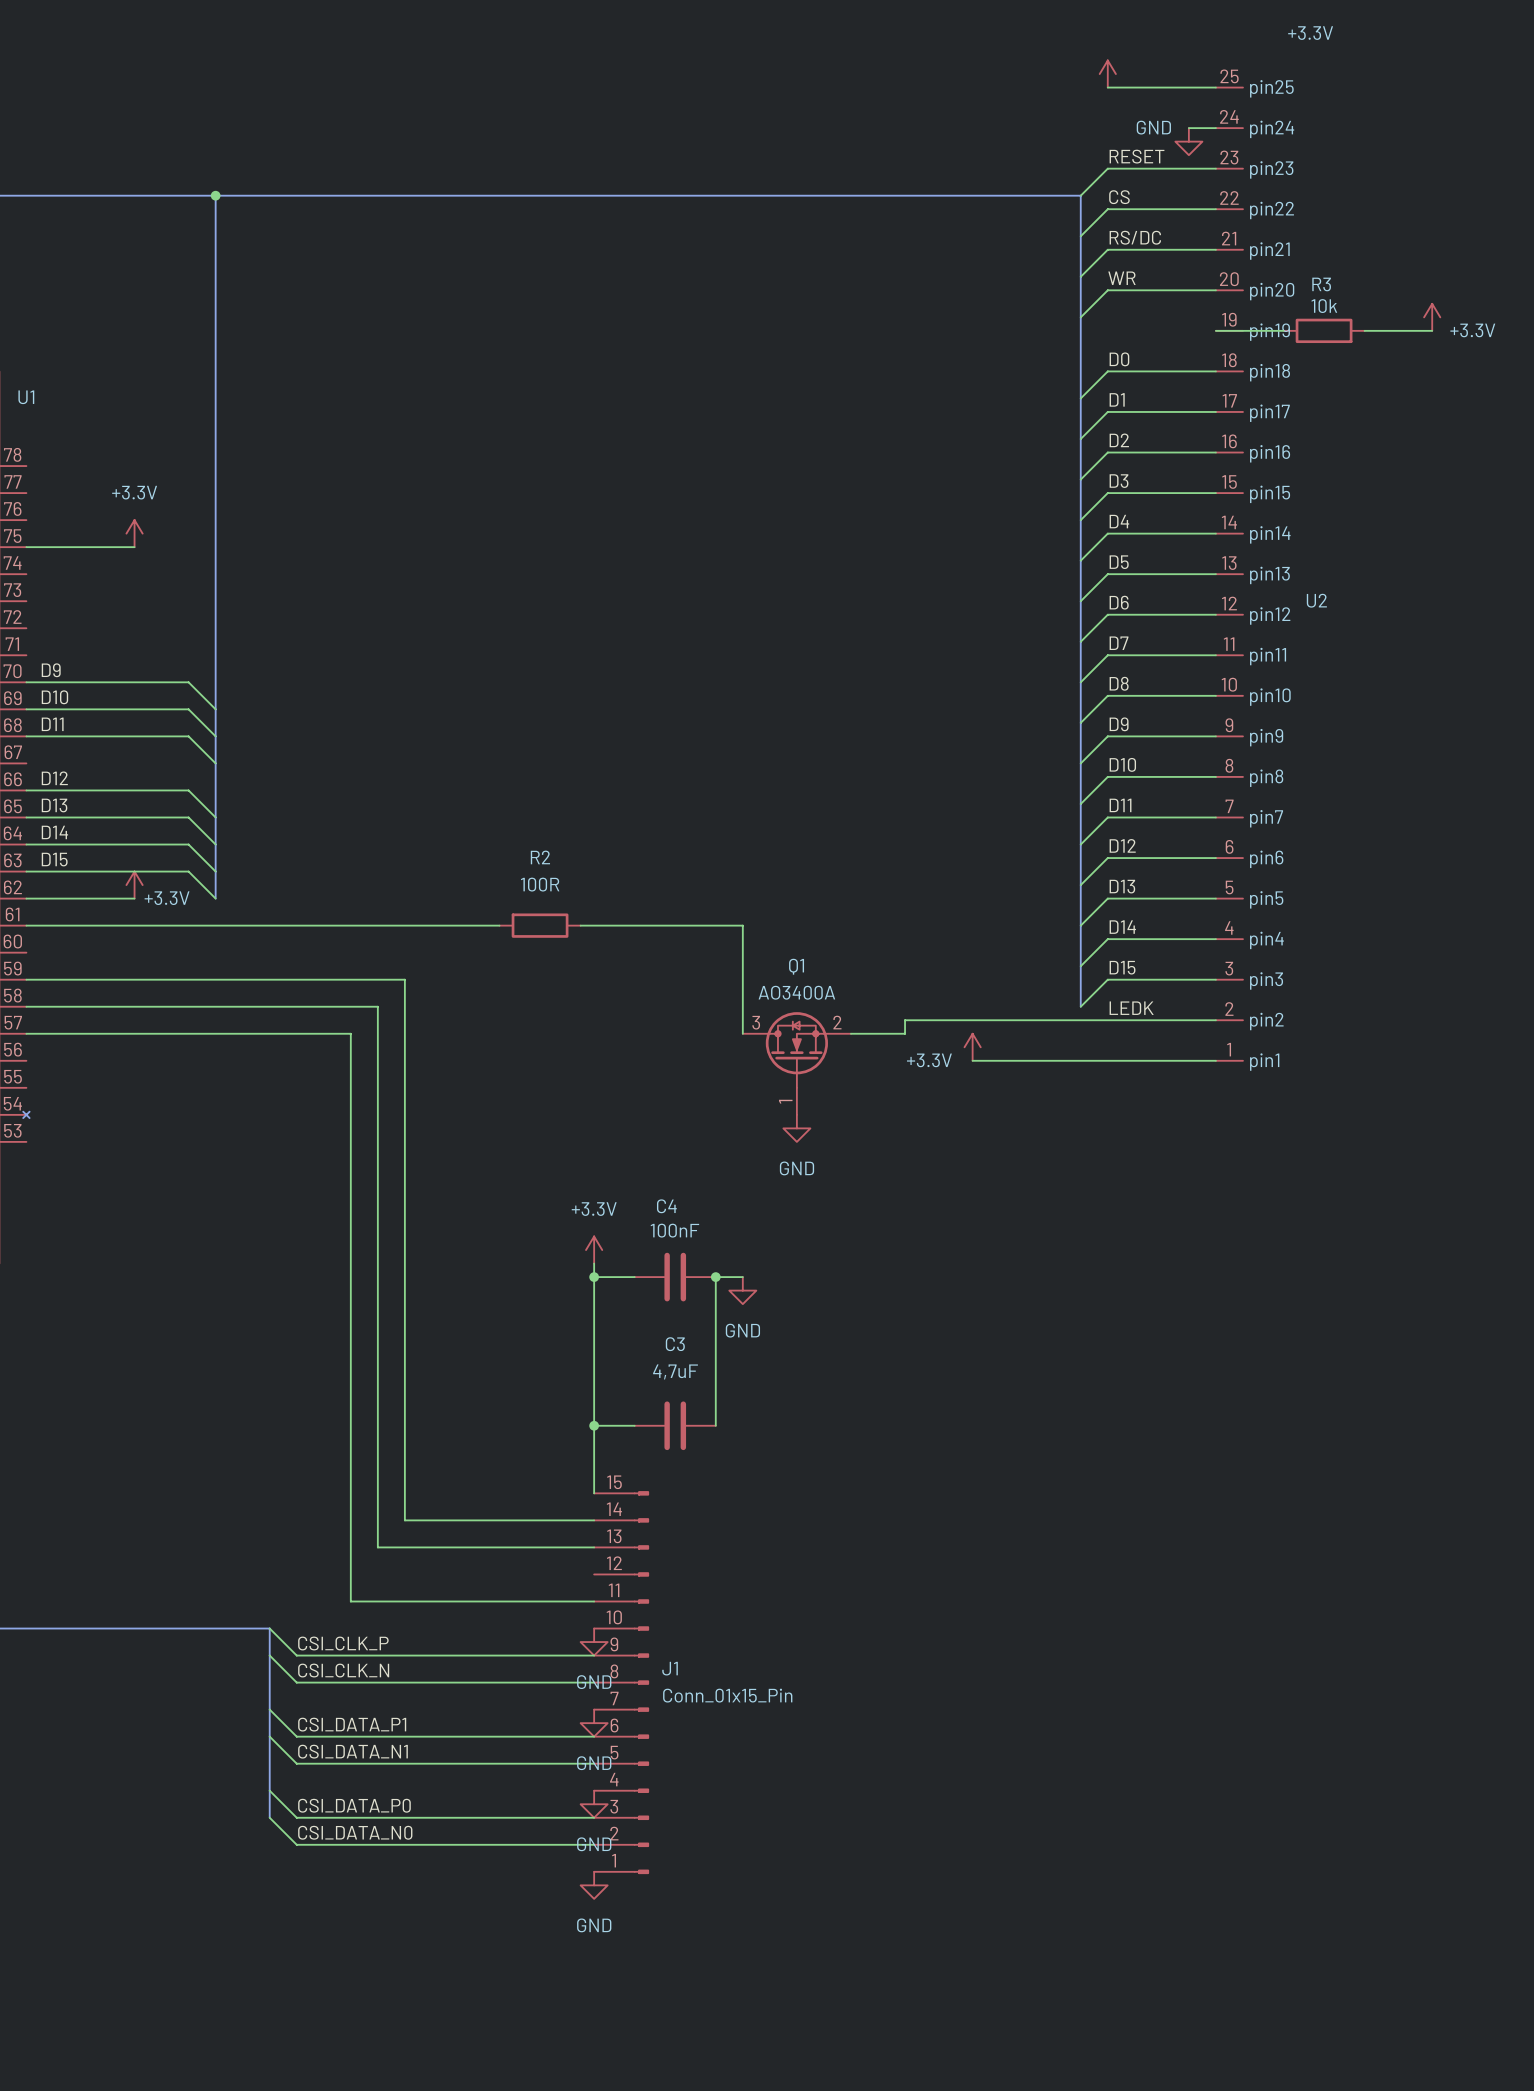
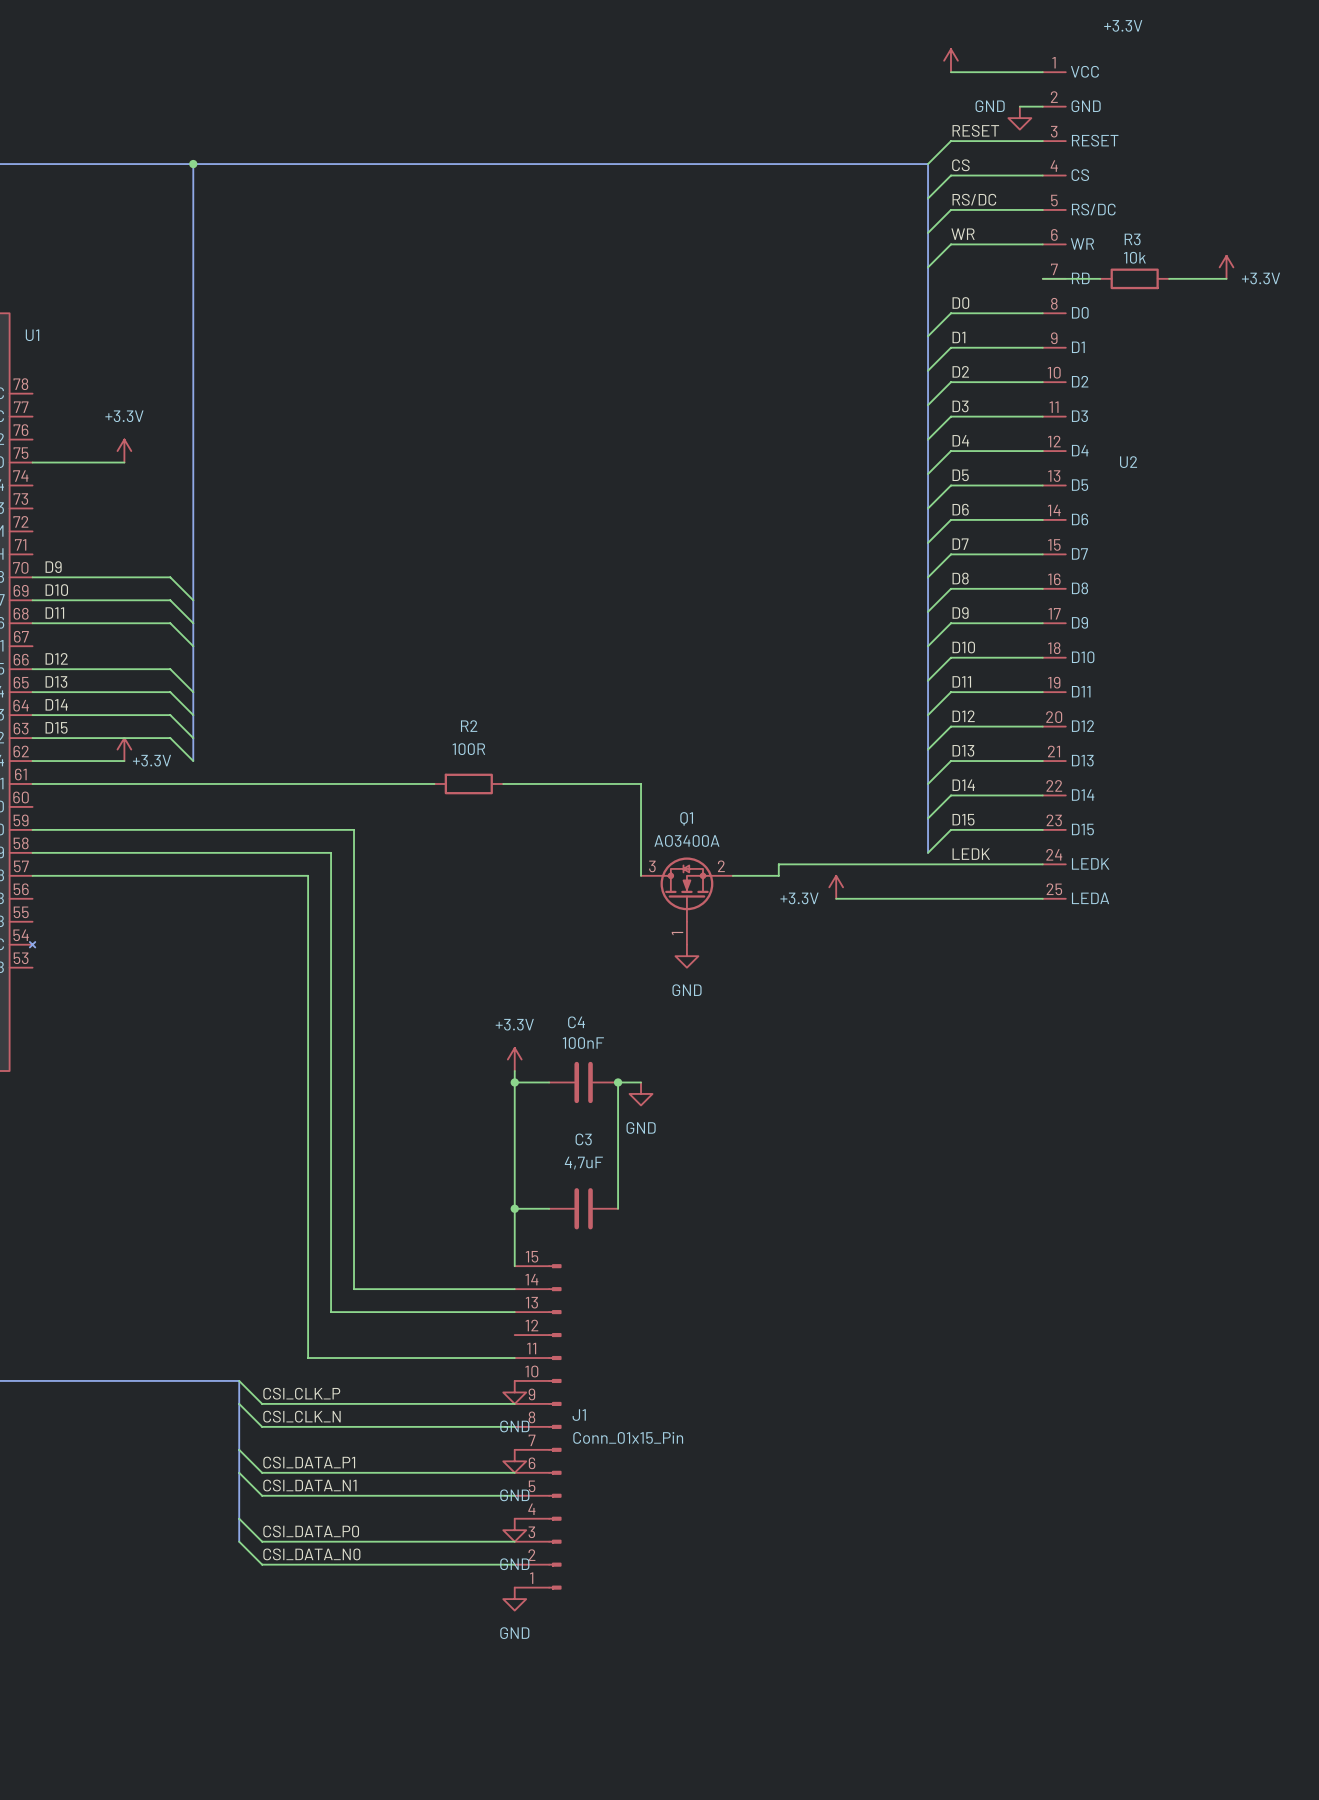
U2 symbol: [1215, 87, 1243, 1061] -> [1042, 72, 1066, 899]
U2 name position: U2 (1316, 600) -> U2 (1128, 462)

